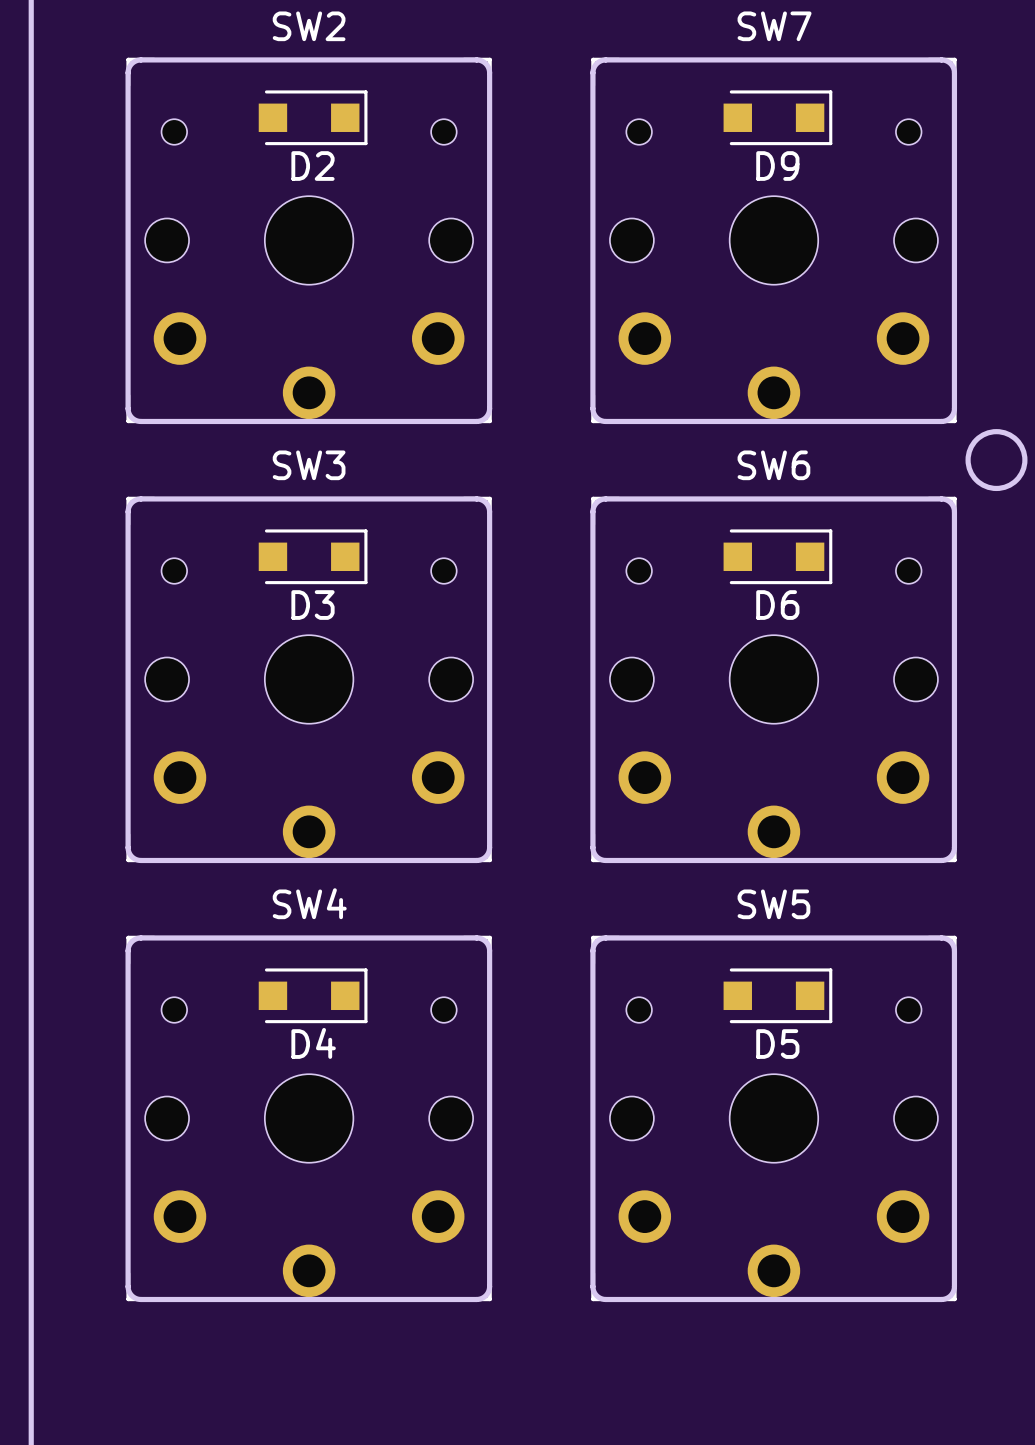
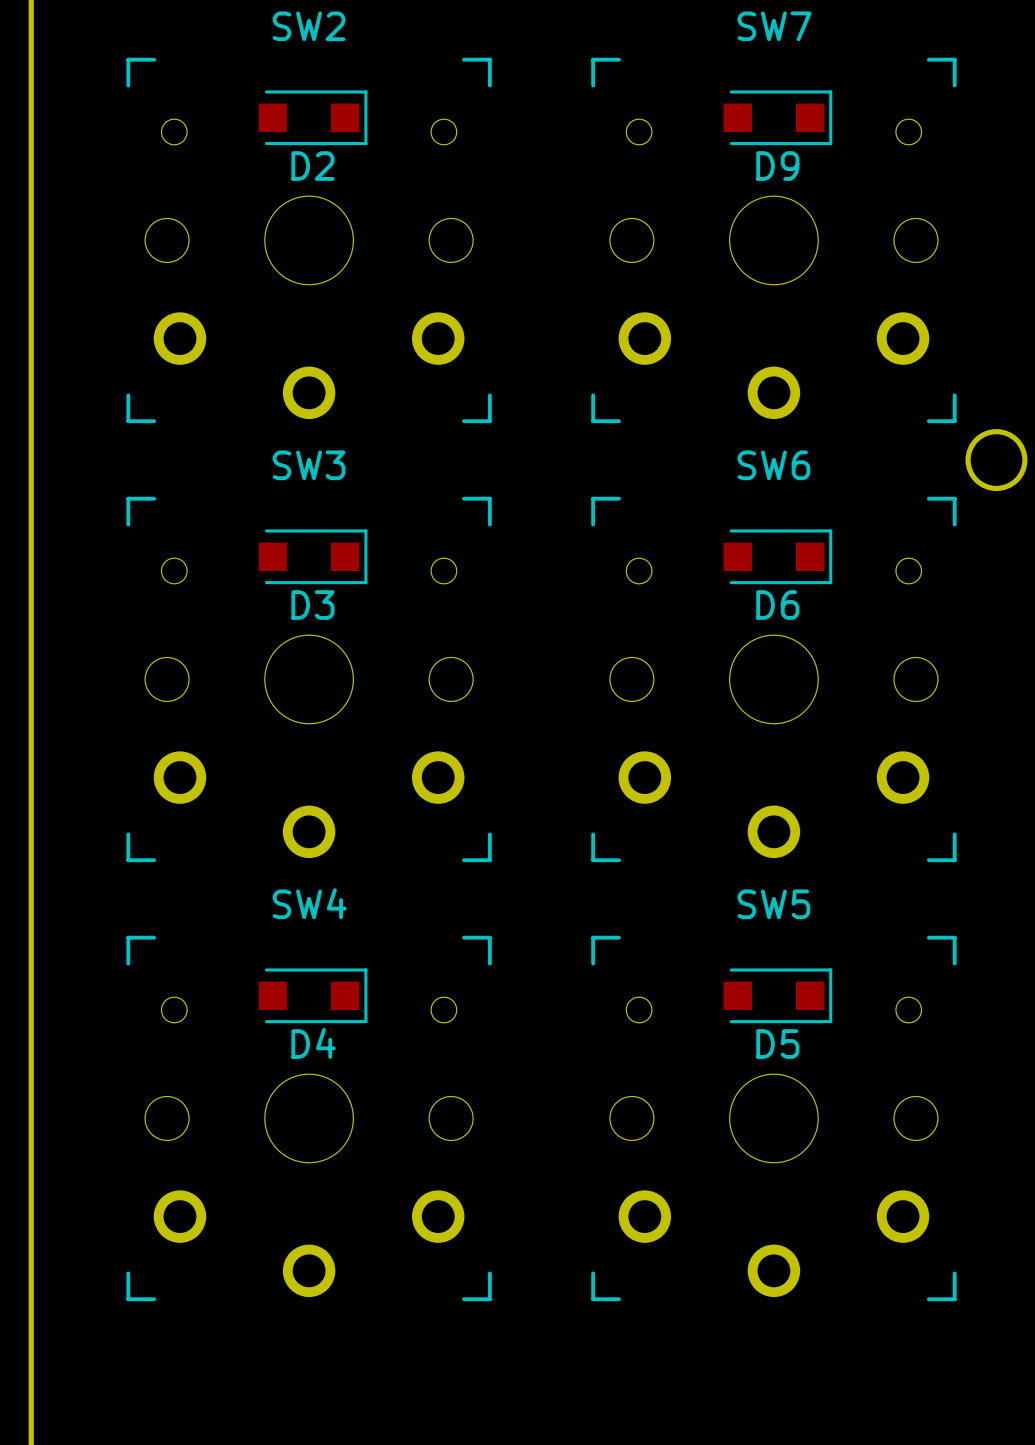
board edge: (140, 59) (476, 59) (485, 63) (489, 72) (489, 408) (485, 417) (476, 421) (140, 421) (131, 417) (128, 408) (128, 72) (131, 63) (140, 59) -> none
board edge: (605, 59) (941, 59) (950, 63) (954, 72) (954, 408) (950, 417) (941, 421) (605, 421) (596, 417) (592, 408) (592, 72) (596, 63) (605, 59) -> none
board edge: (140, 498) (476, 498) (485, 502) (489, 511) (489, 847) (485, 856) (476, 860) (140, 860) (131, 856) (128, 847) (128, 511) (131, 502) (140, 498) -> none
board edge: (605, 498) (941, 498) (950, 502) (954, 511) (954, 847) (950, 856) (941, 860) (605, 860) (596, 856) (592, 847) (592, 511) (596, 502) (605, 498) -> none
board edge: (140, 937) (476, 937) (485, 941) (489, 950) (489, 1286) (485, 1295) (476, 1299) (140, 1299) (131, 1295) (128, 1286) (128, 950) (131, 941) (140, 937) -> none
board edge: (605, 937) (941, 937) (950, 941) (954, 950) (954, 1286) (950, 1295) (941, 1299) (605, 1299) (596, 1295) (592, 1286) (592, 950) (596, 941) (605, 937) -> none

